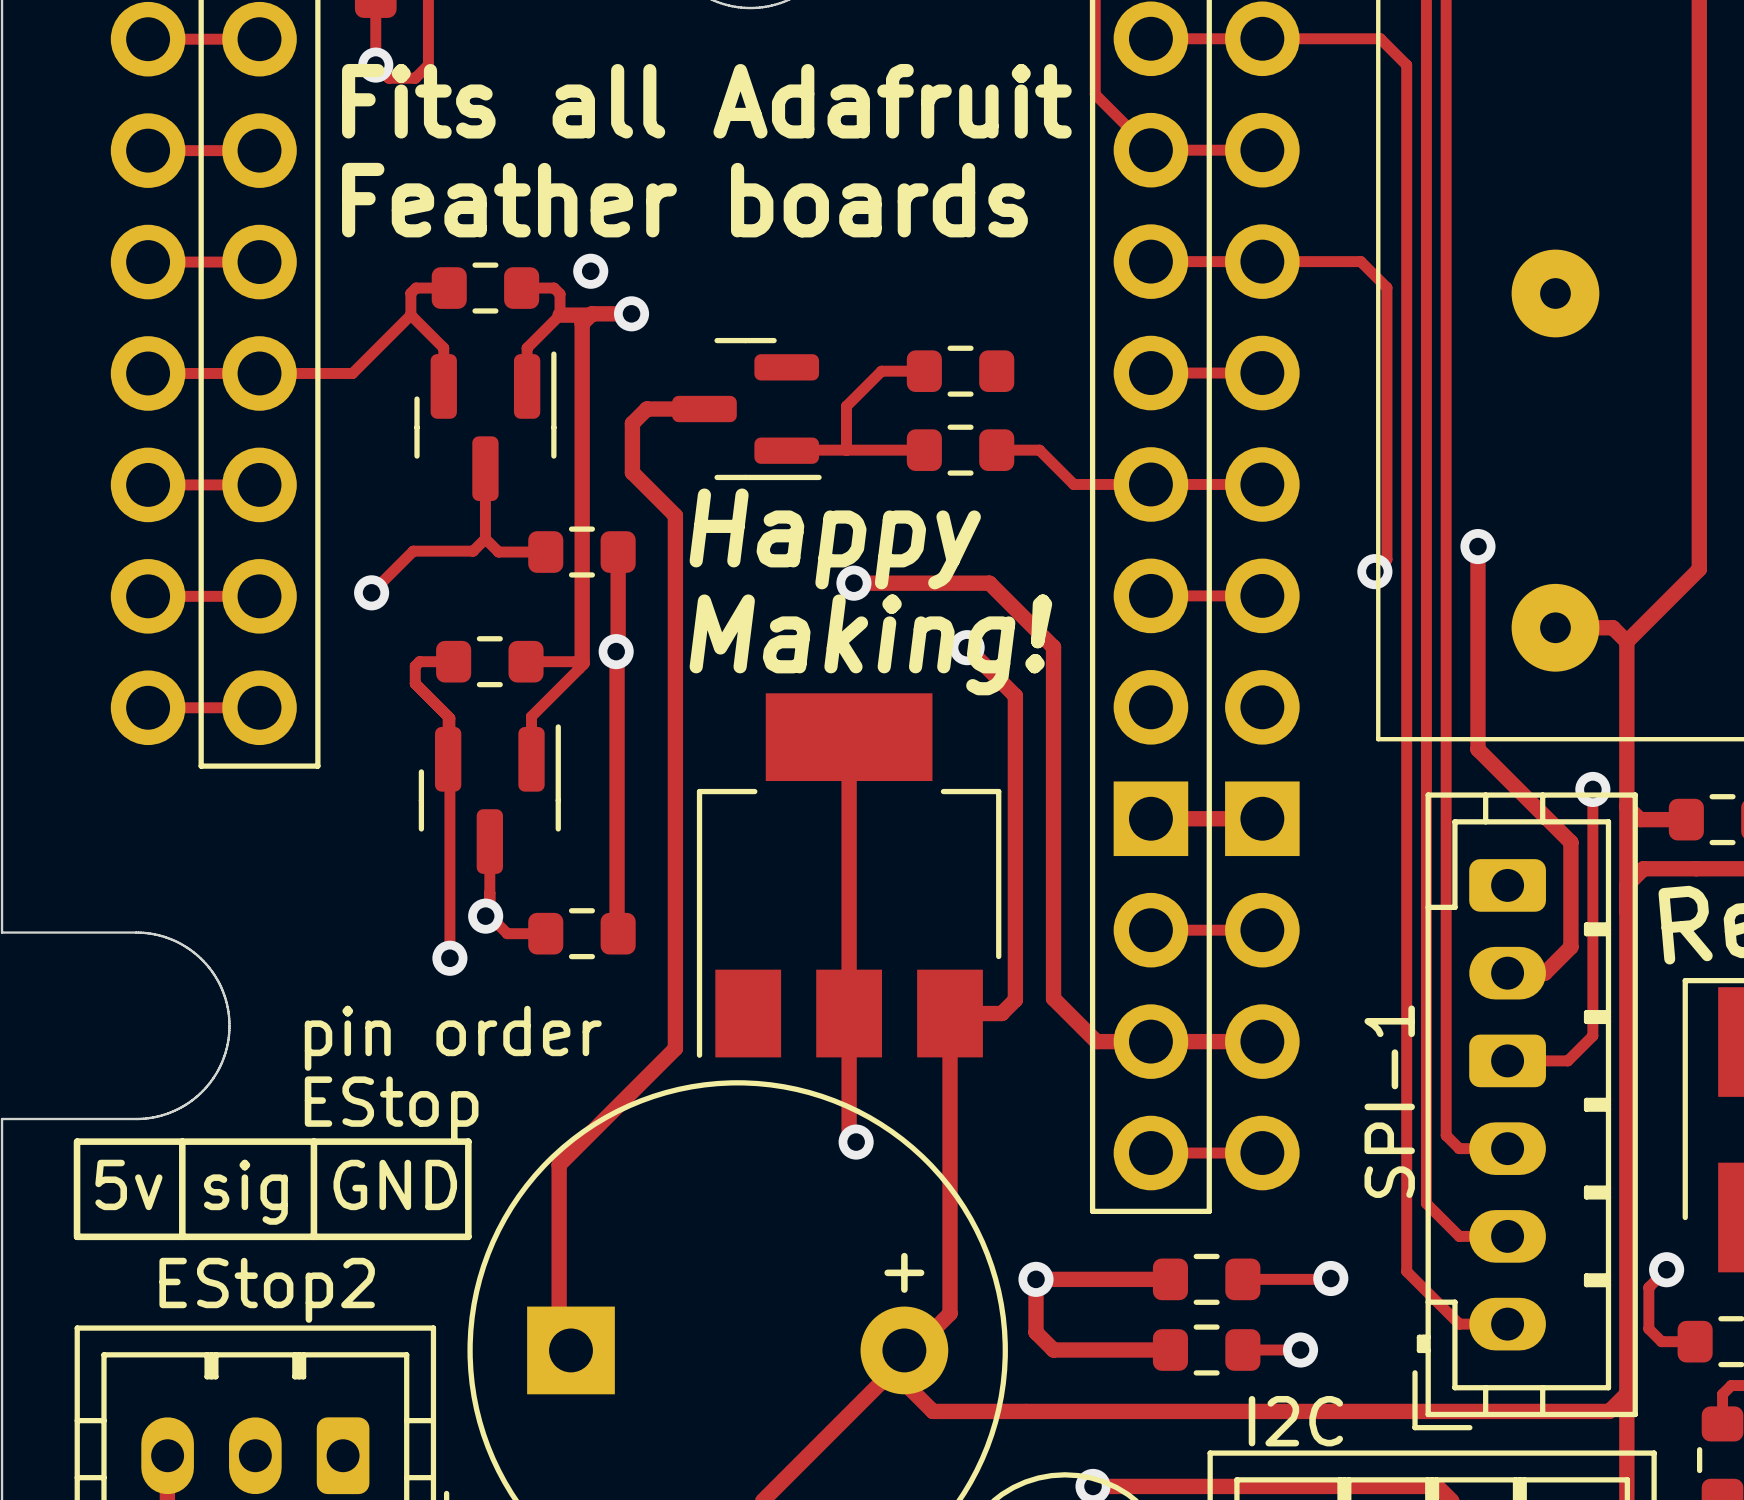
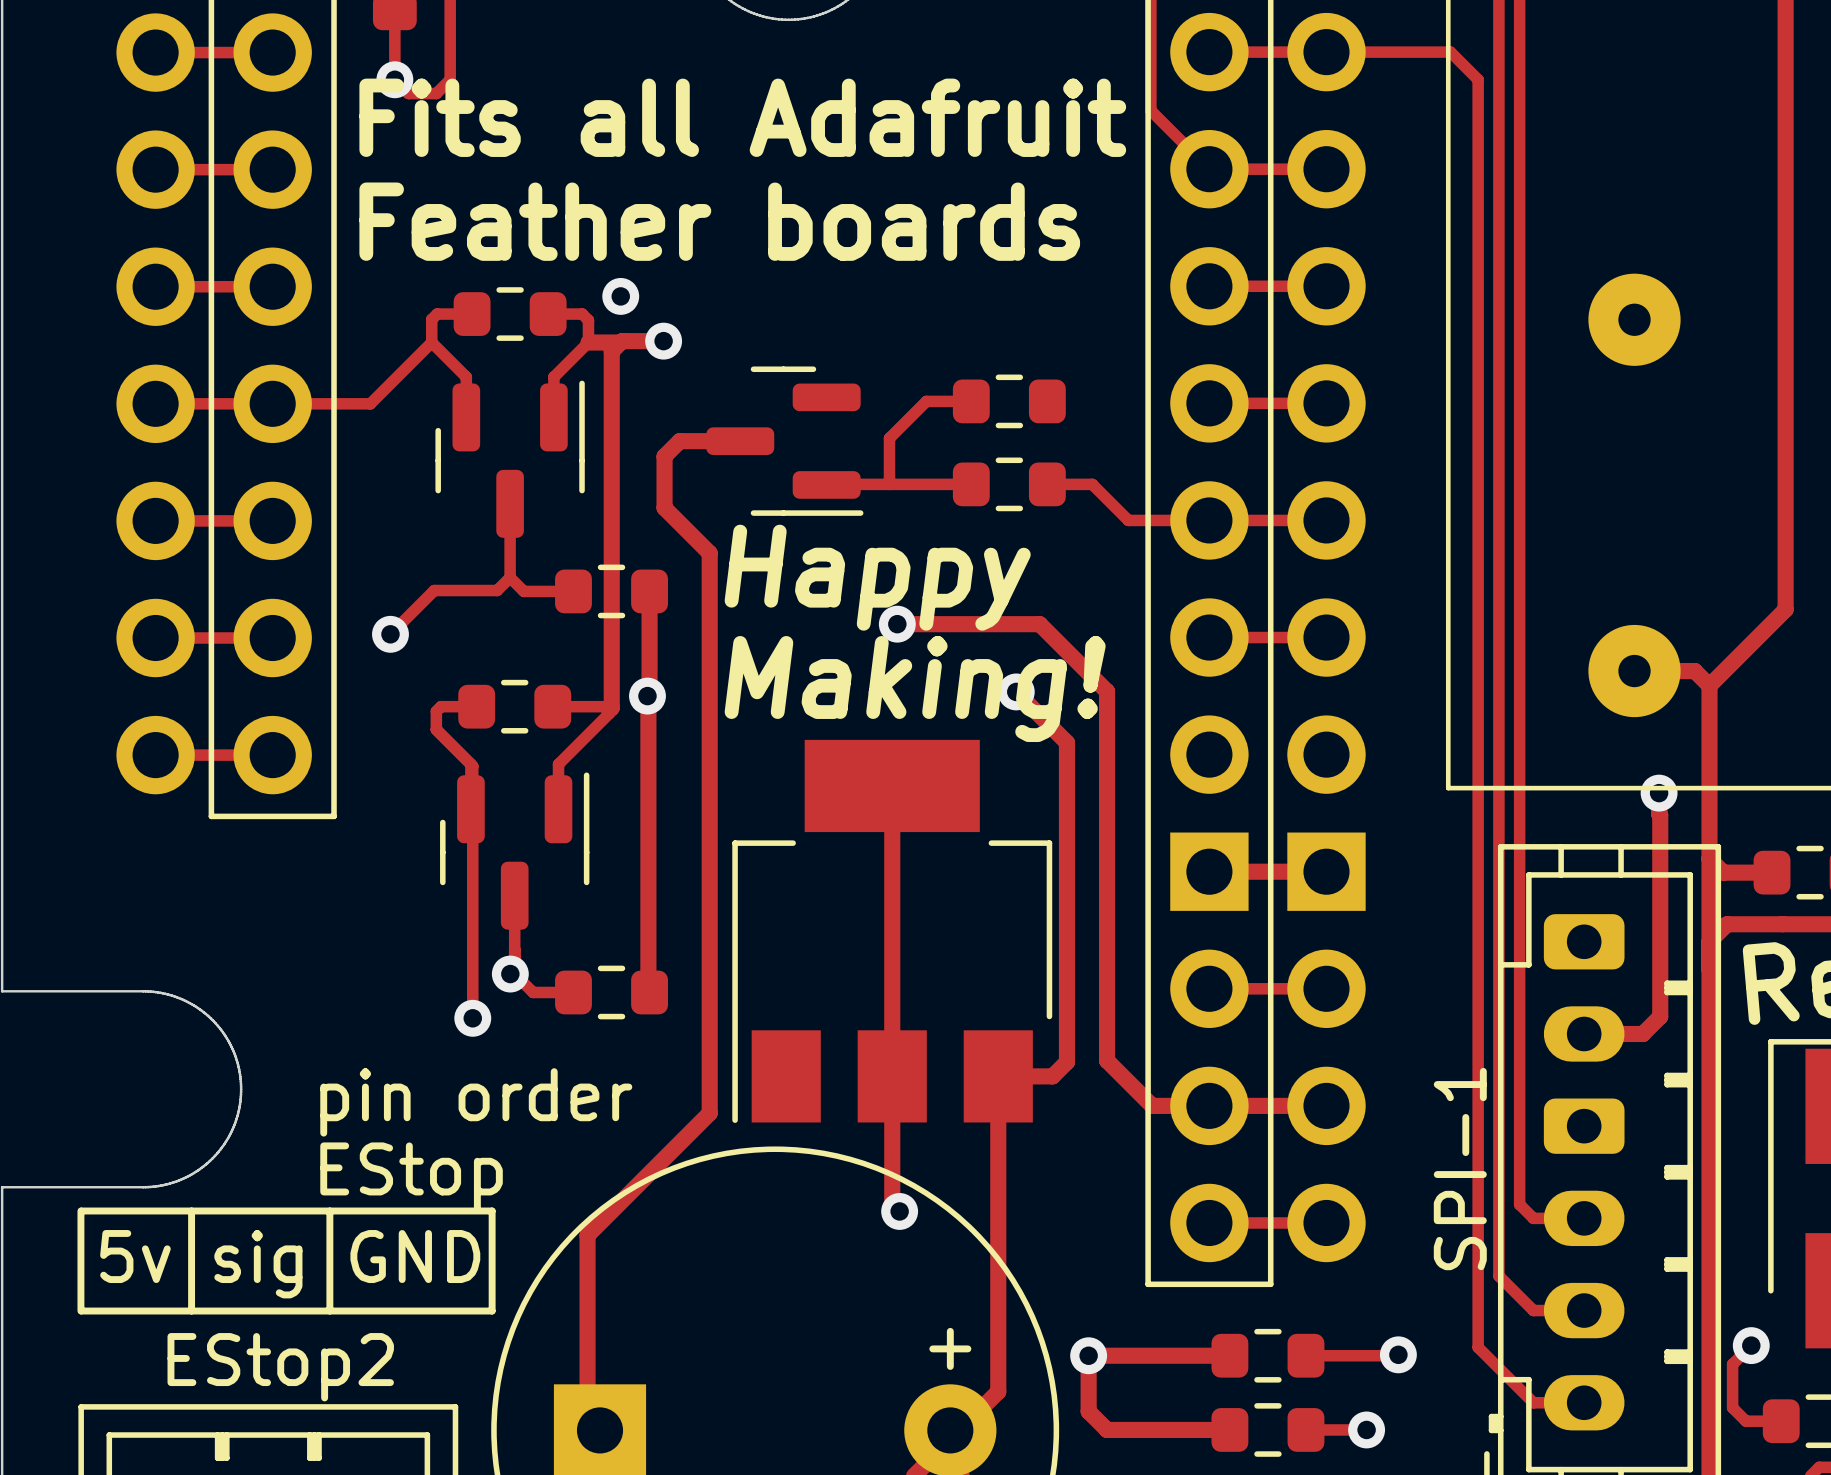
track: (1262, 261) (1360, 261) (1386, 287) (1386, 559) (1374, 571) -> none
track: (1477, 546) (1477, 749) (1570, 842) (1570, 947) (1544, 973) -> (1659, 793) (1660, 1016) (1642, 1033) (1623, 1033)
via: (1477, 546) -> none
via: (1374, 571) -> none
track: (1592, 789) (1592, 1035) (1567, 1060) (1507, 1060) -> none
via position: (1592, 789) -> (1659, 793)

